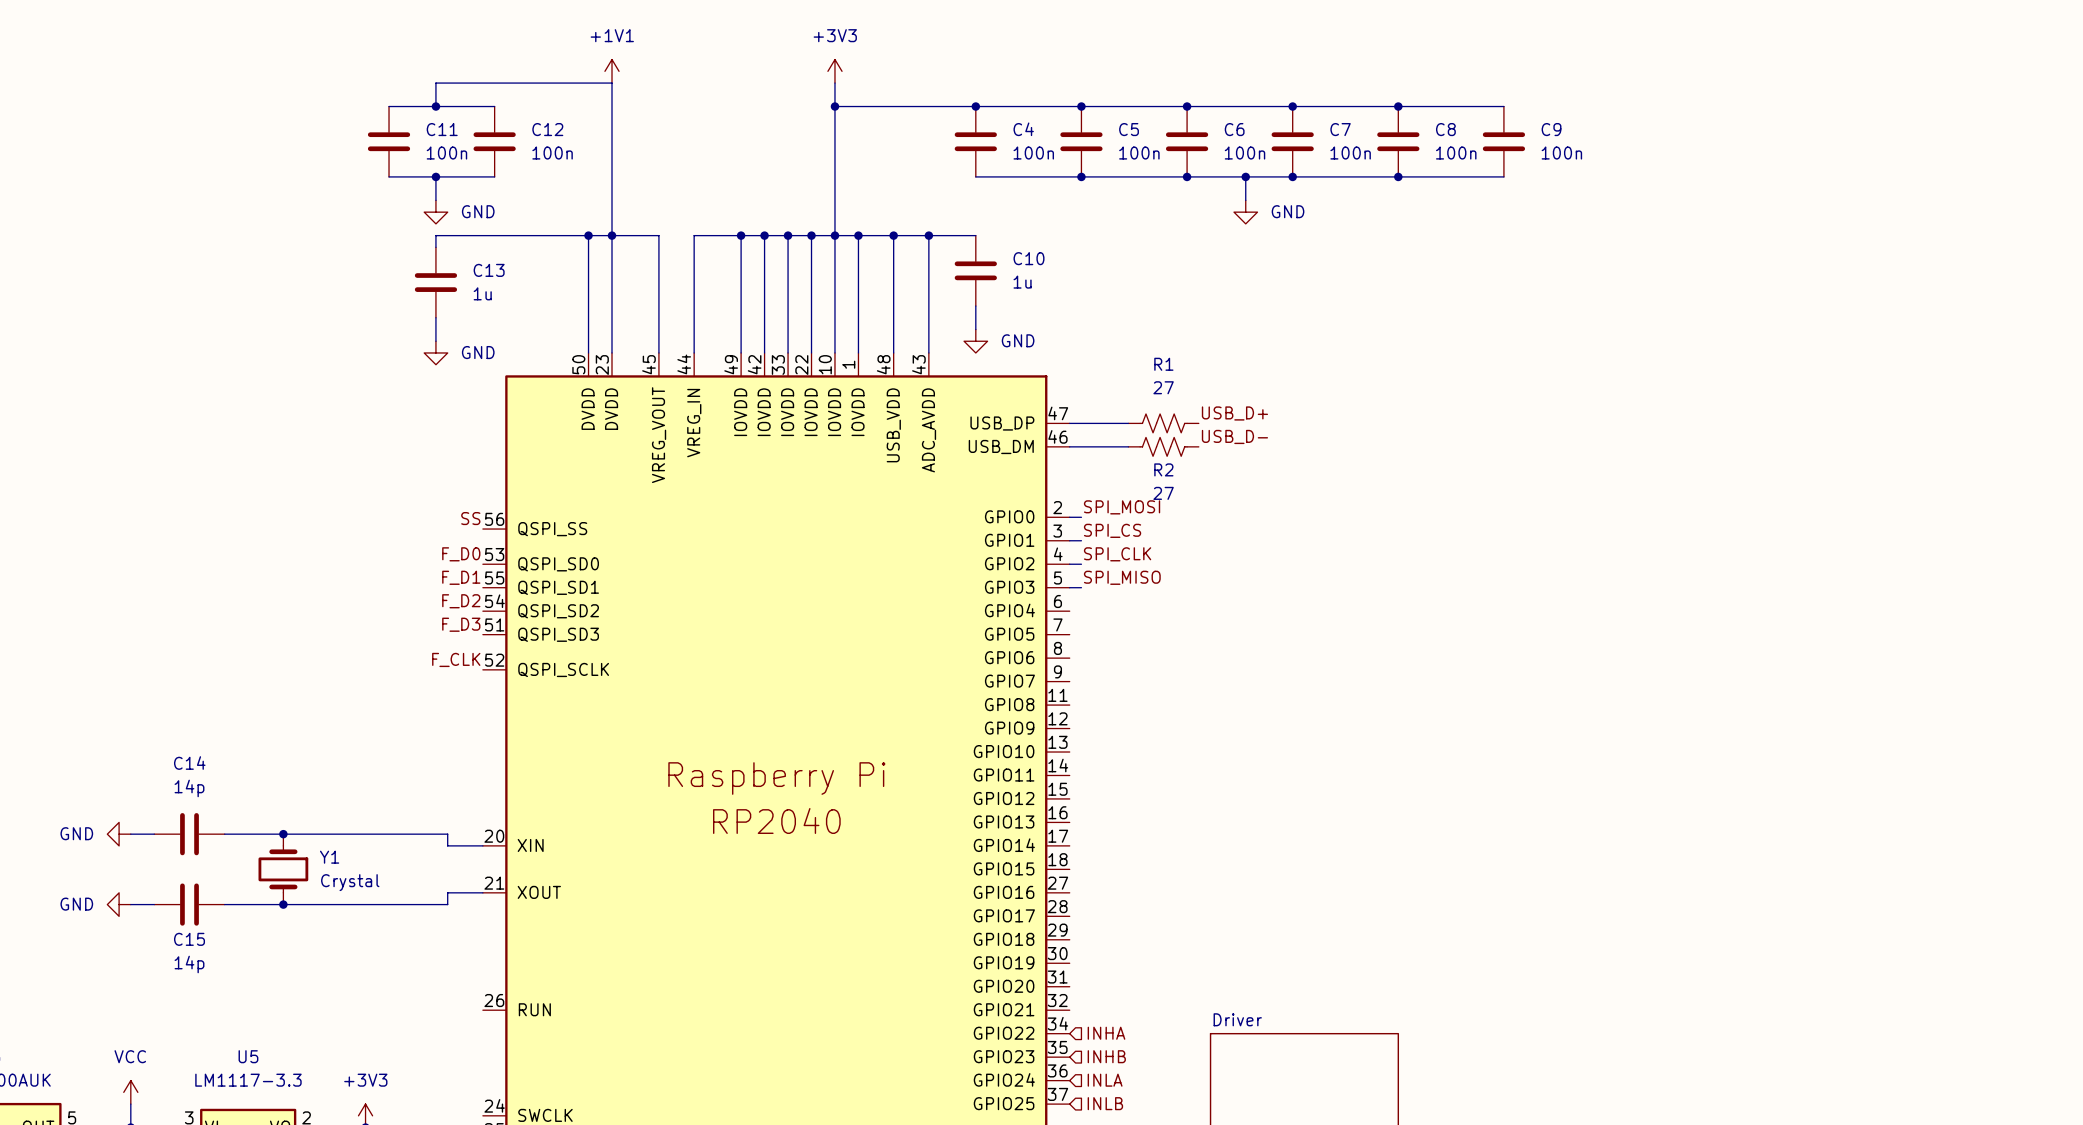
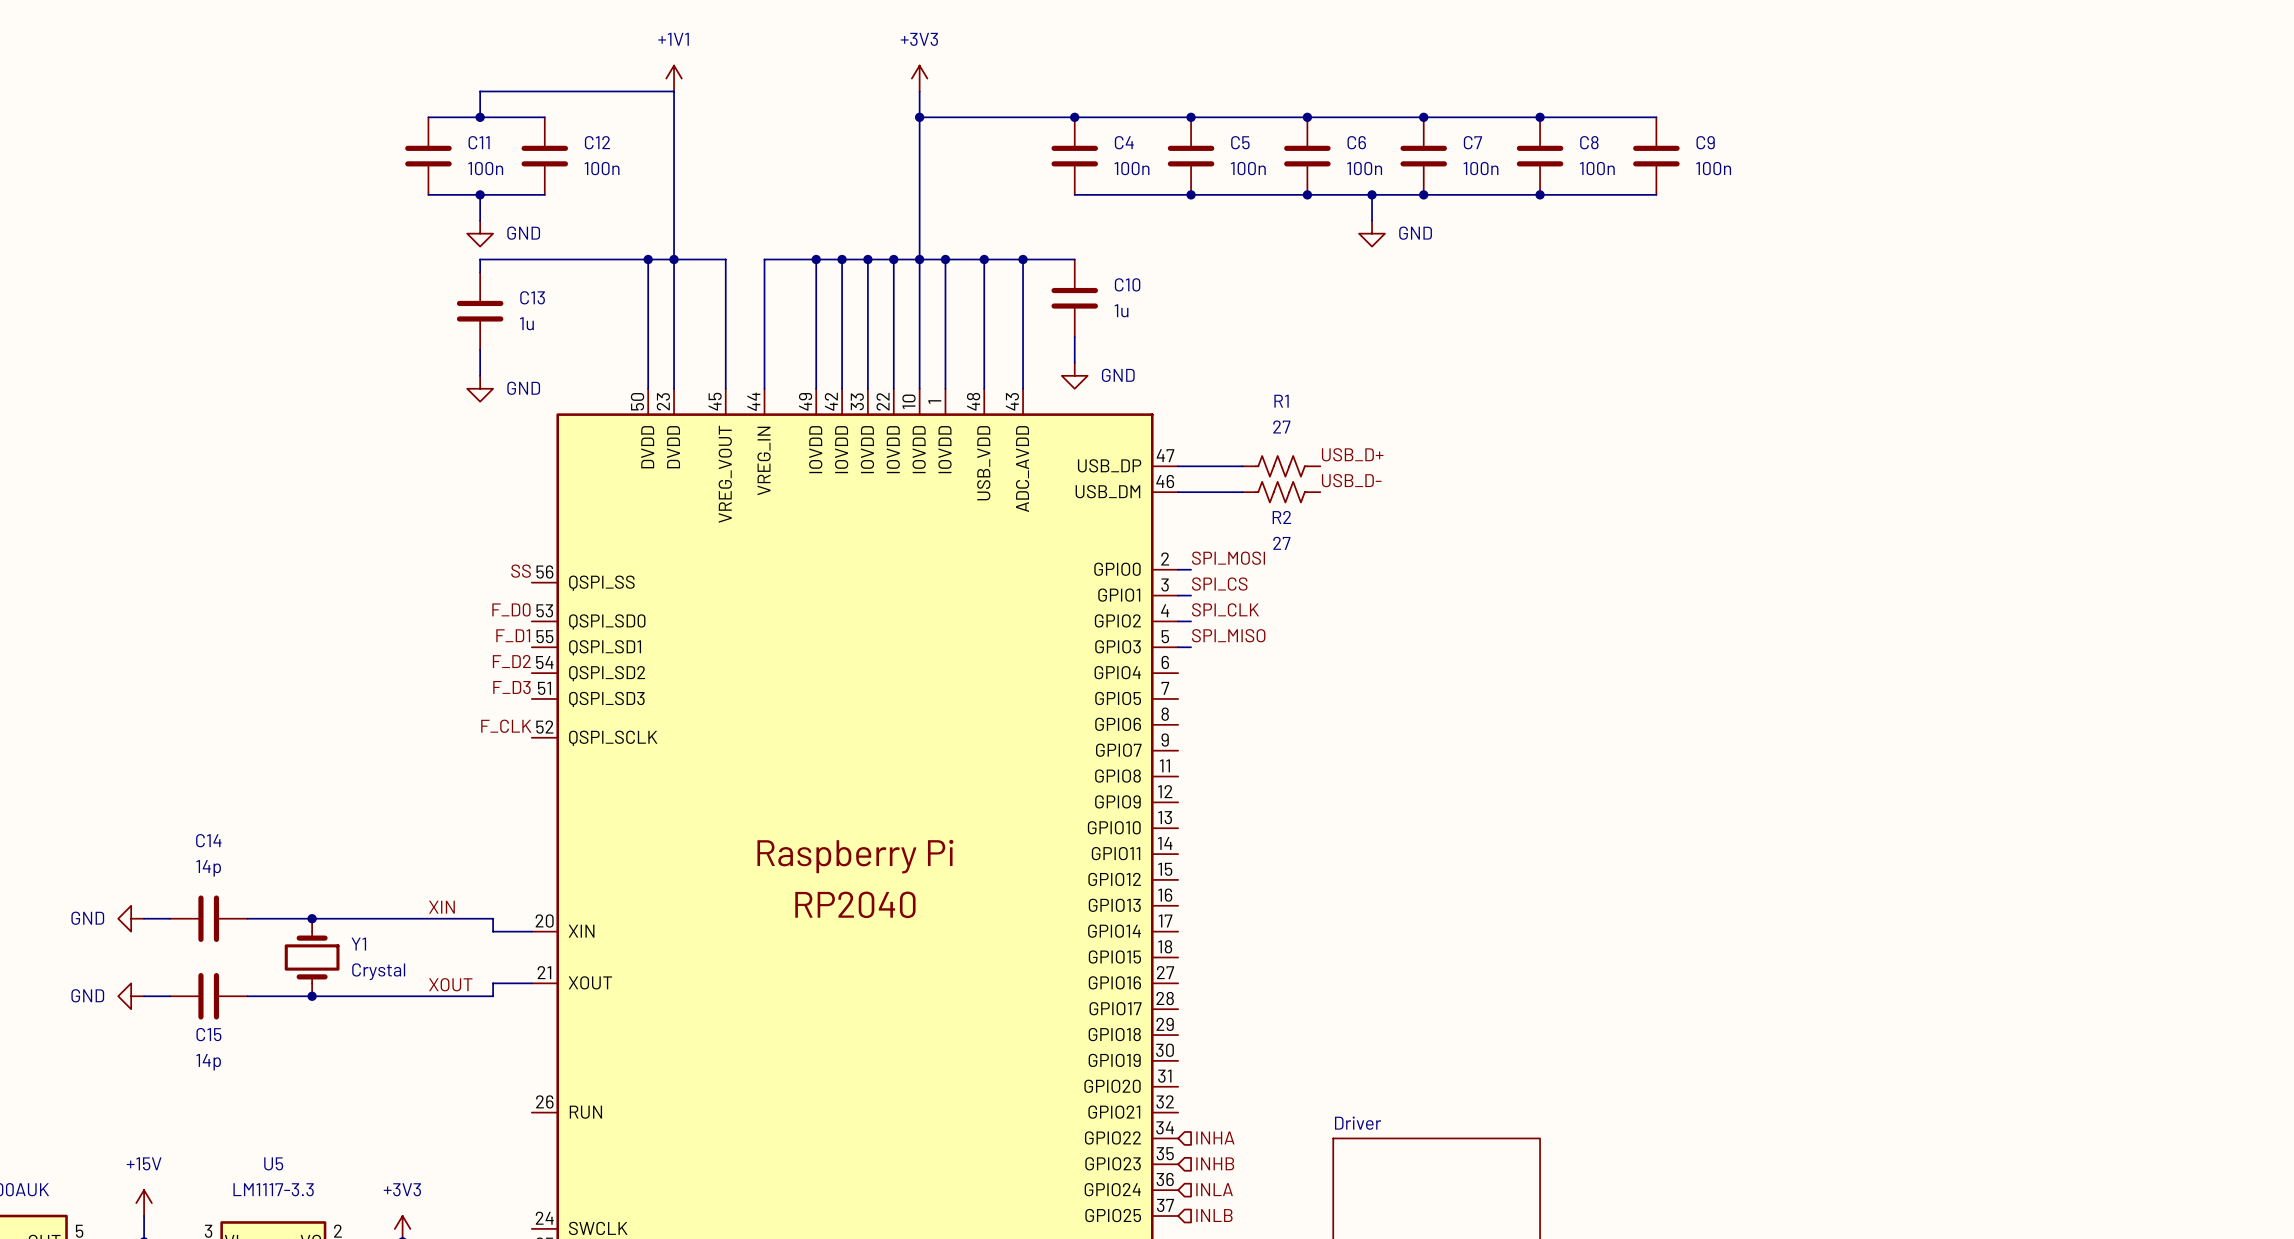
label: none -> XIN (441, 907)
label: none -> XOUT (450, 984)
power symbol: VCC (130, 1092) -> +15V (144, 1203)

